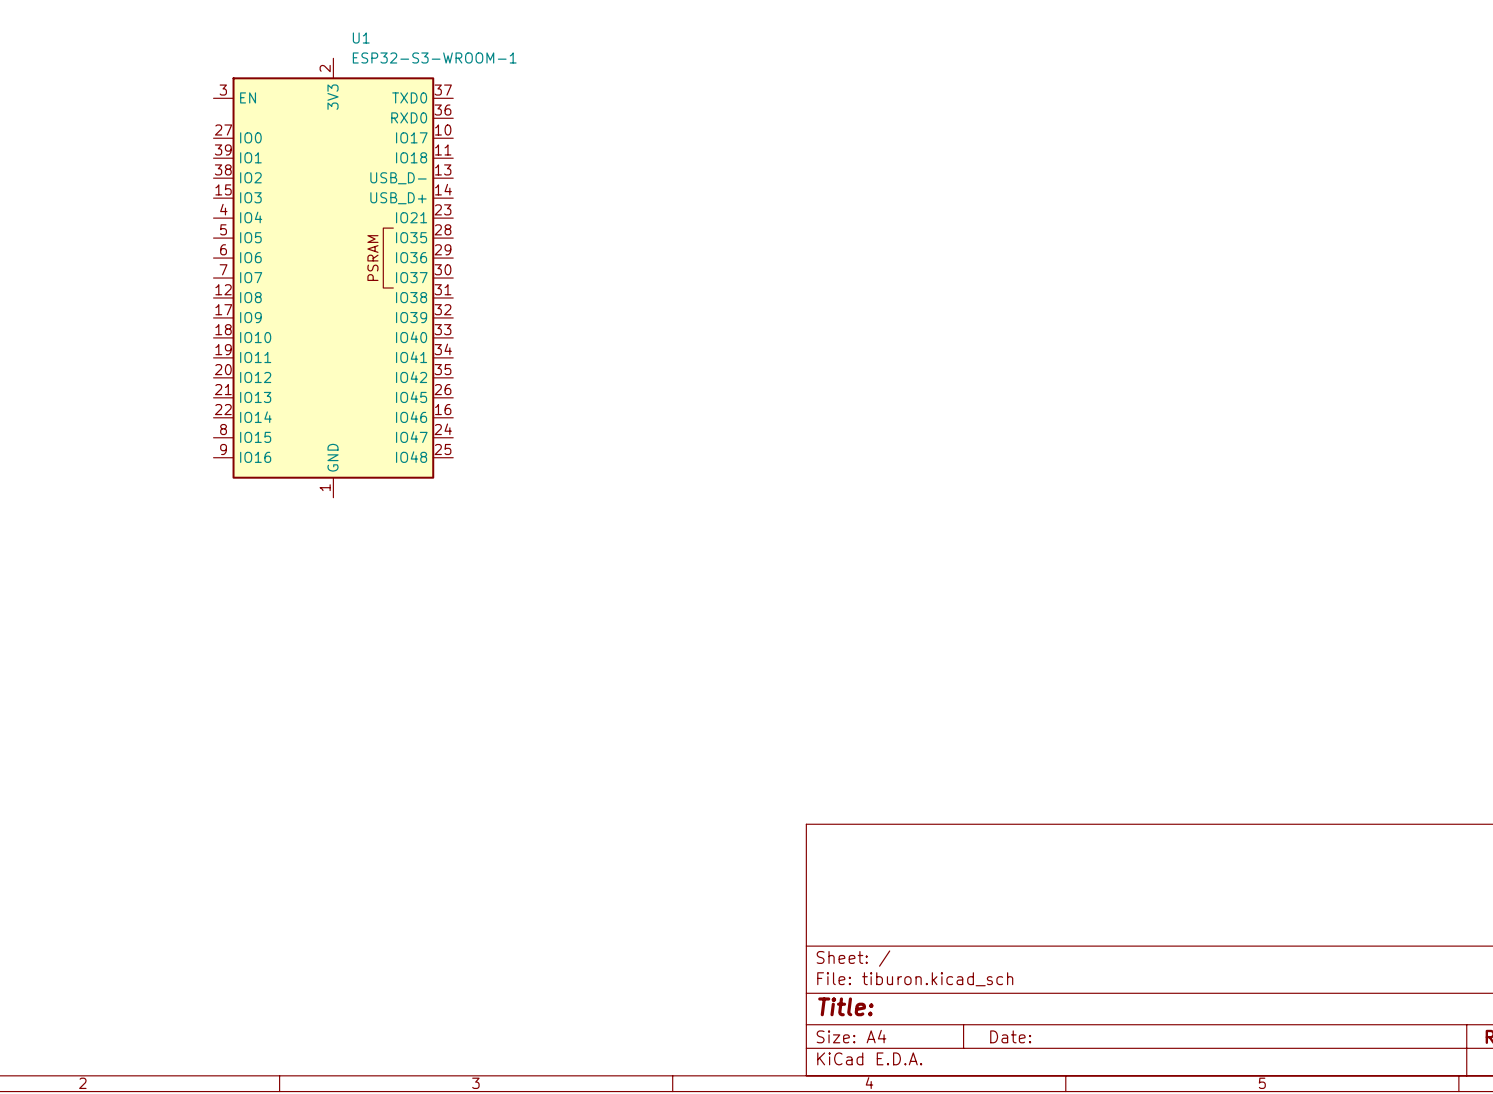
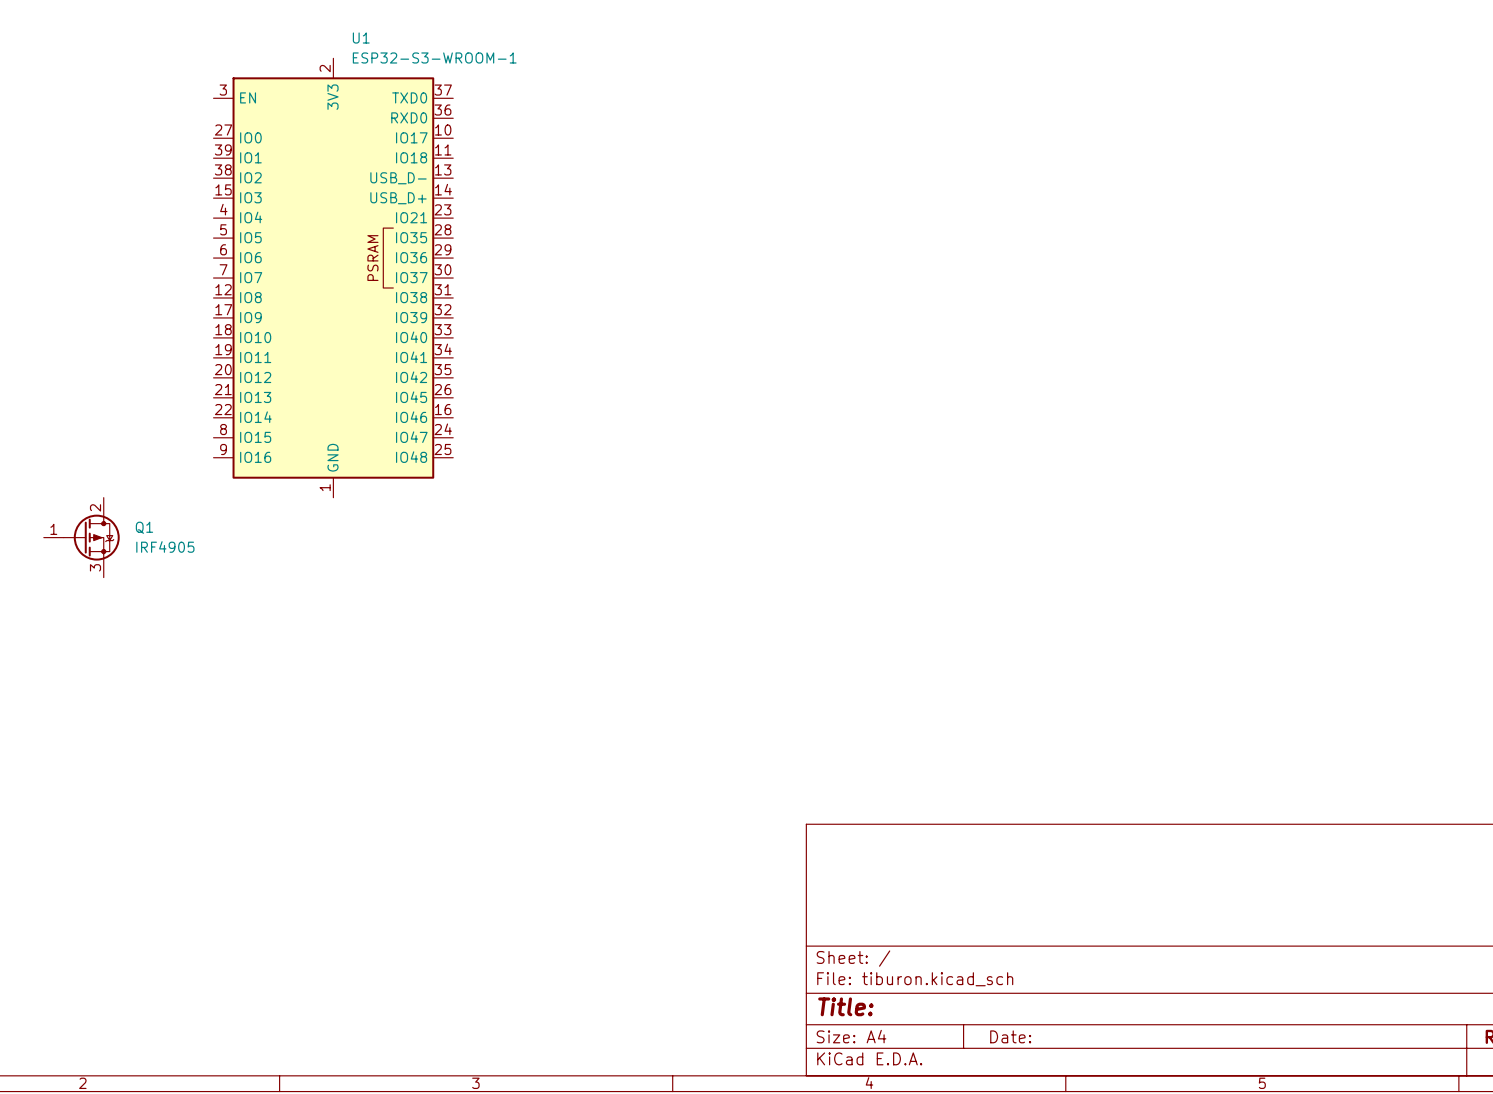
Q1: none -> IRF4905 (81, 537)

